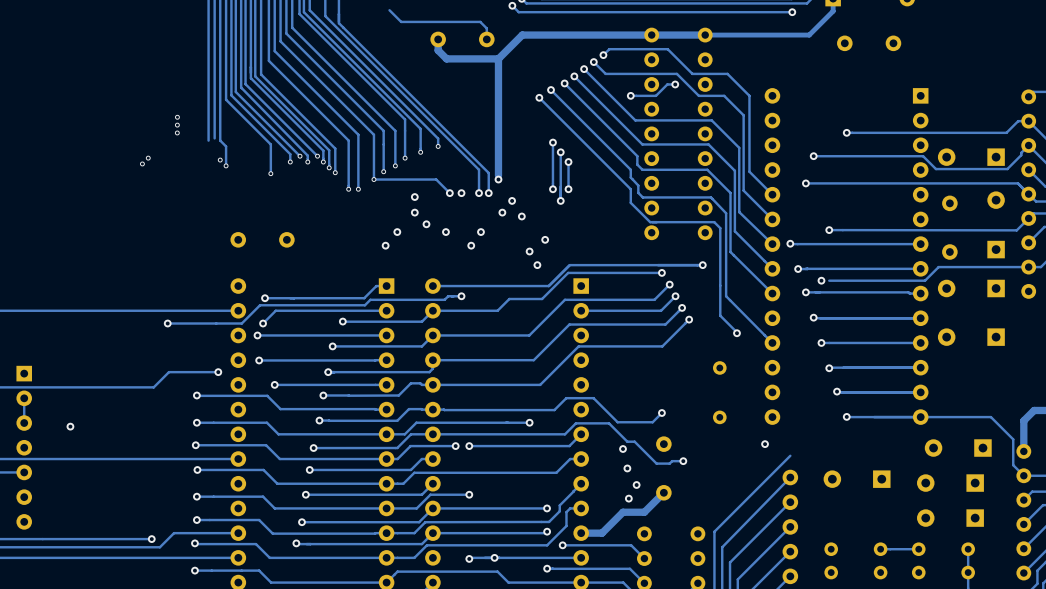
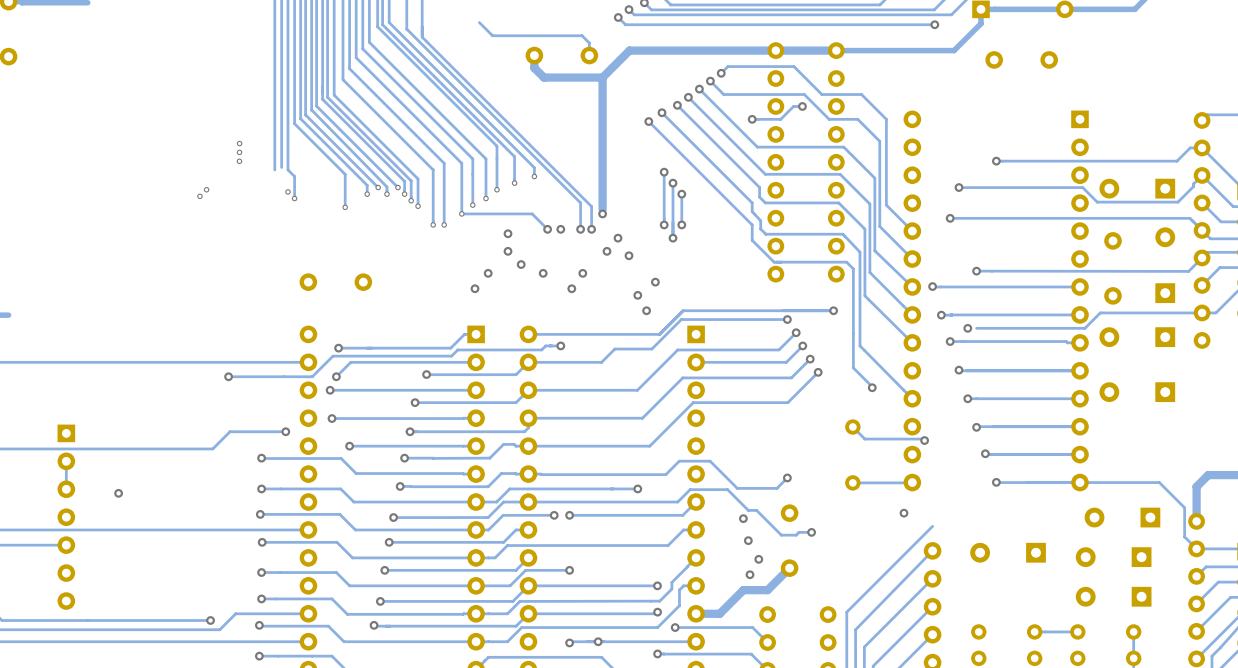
track: none -> (852, 427) (864, 439) (924, 440)
via: none -> (924, 440)
track: none -> (912, 482) (852, 482)

